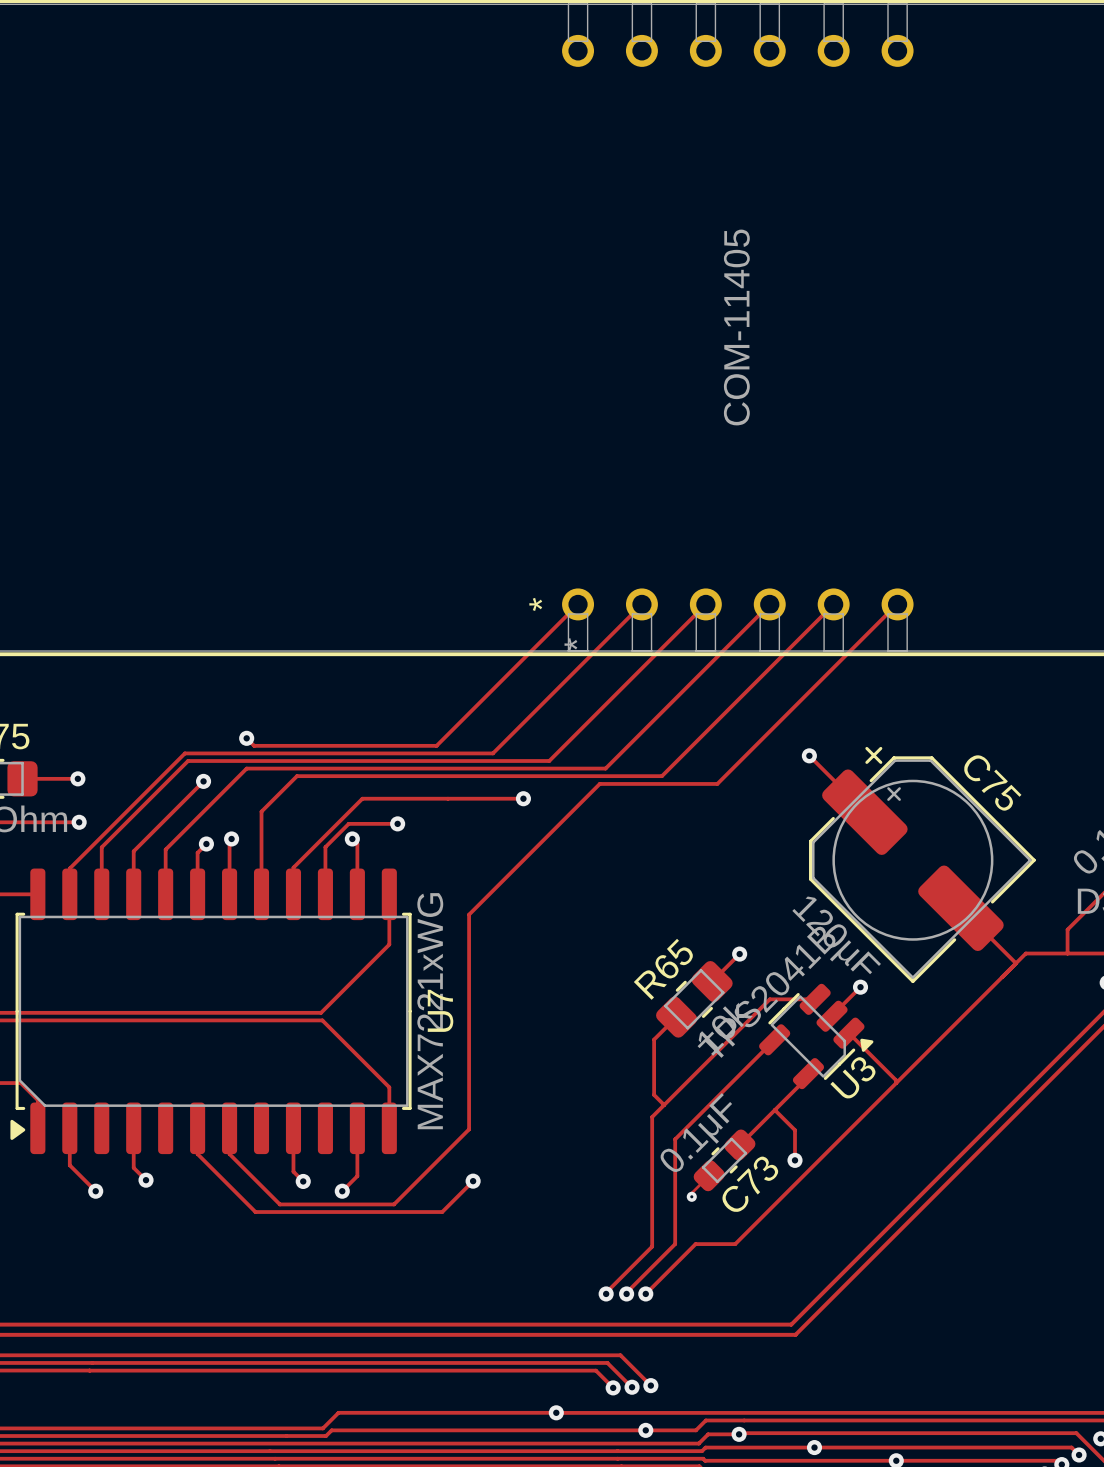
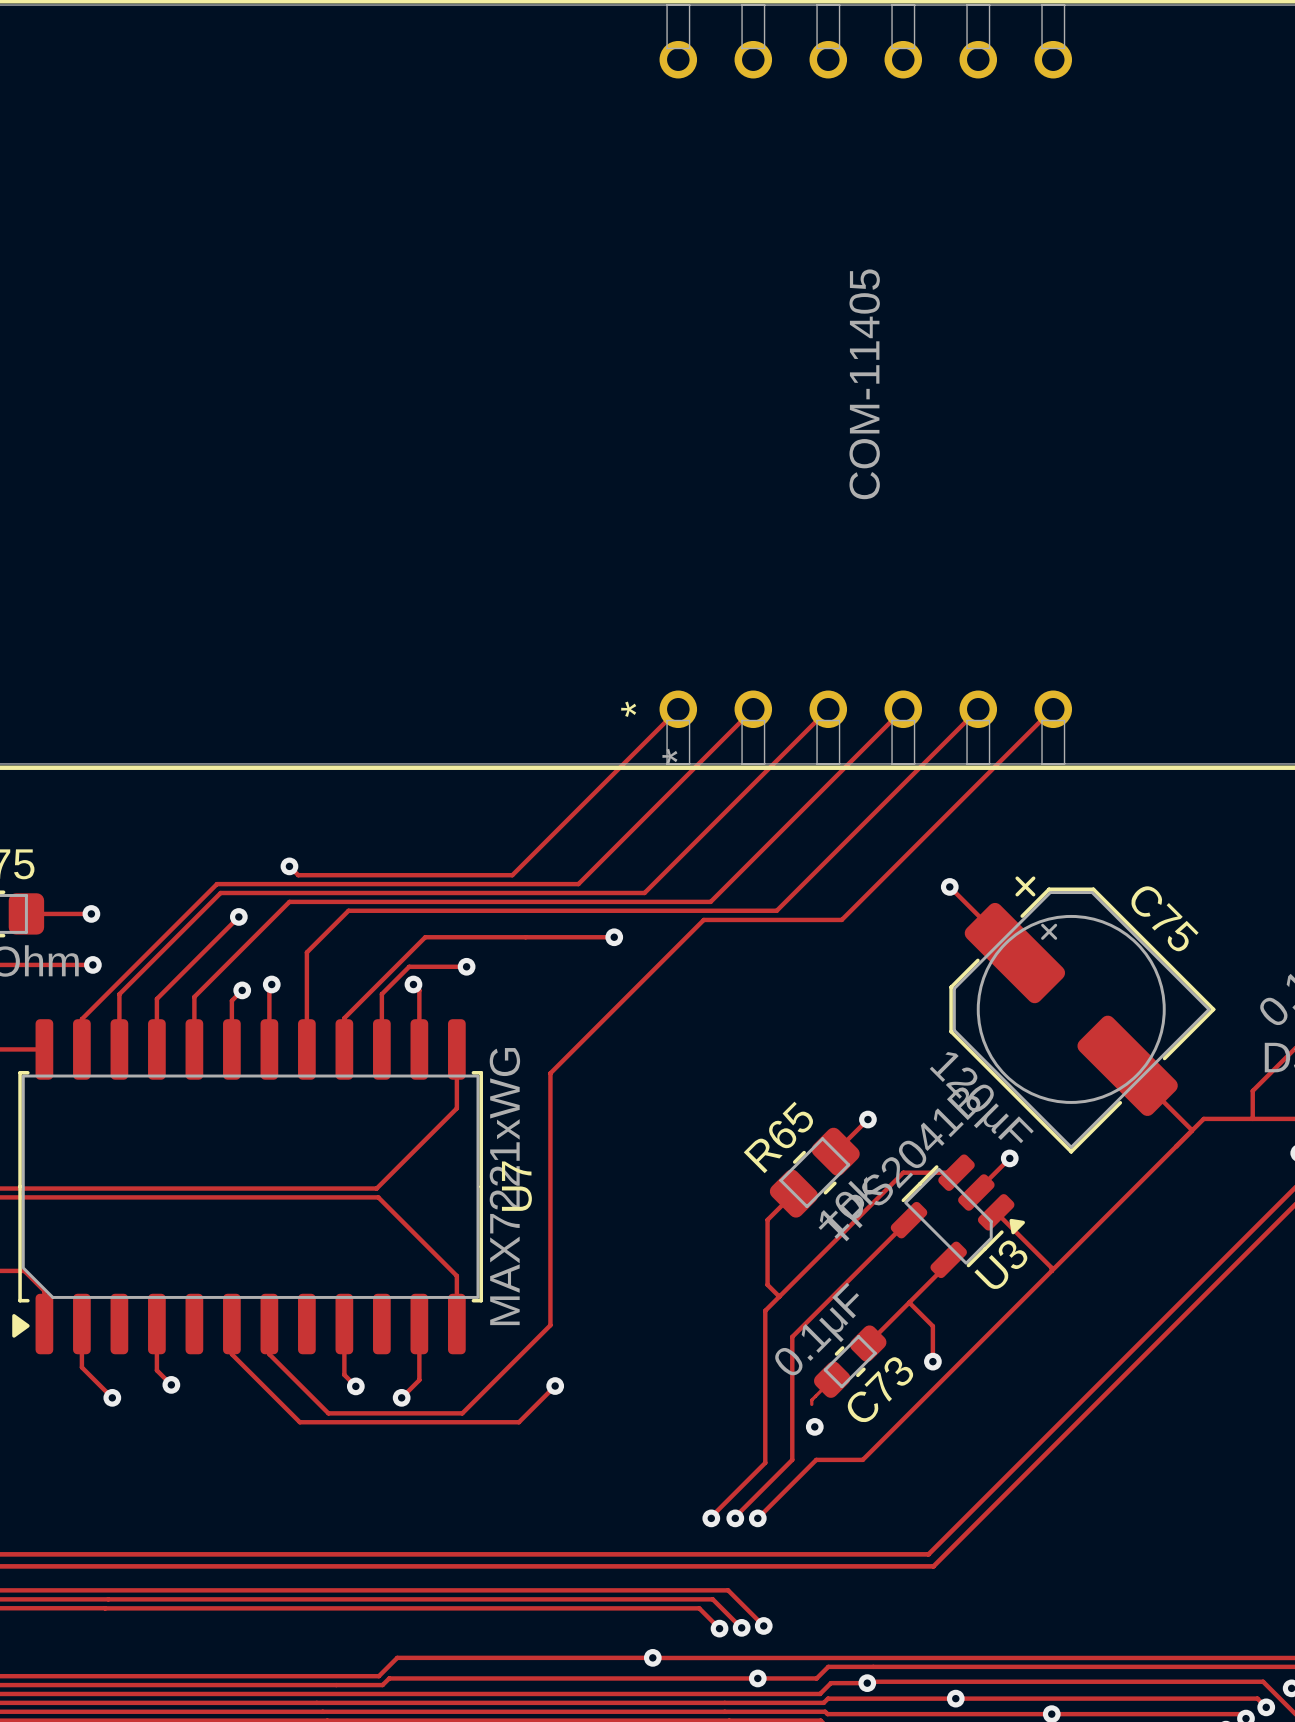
via: (691, 1196) -> none
via: none -> (814, 1426)

